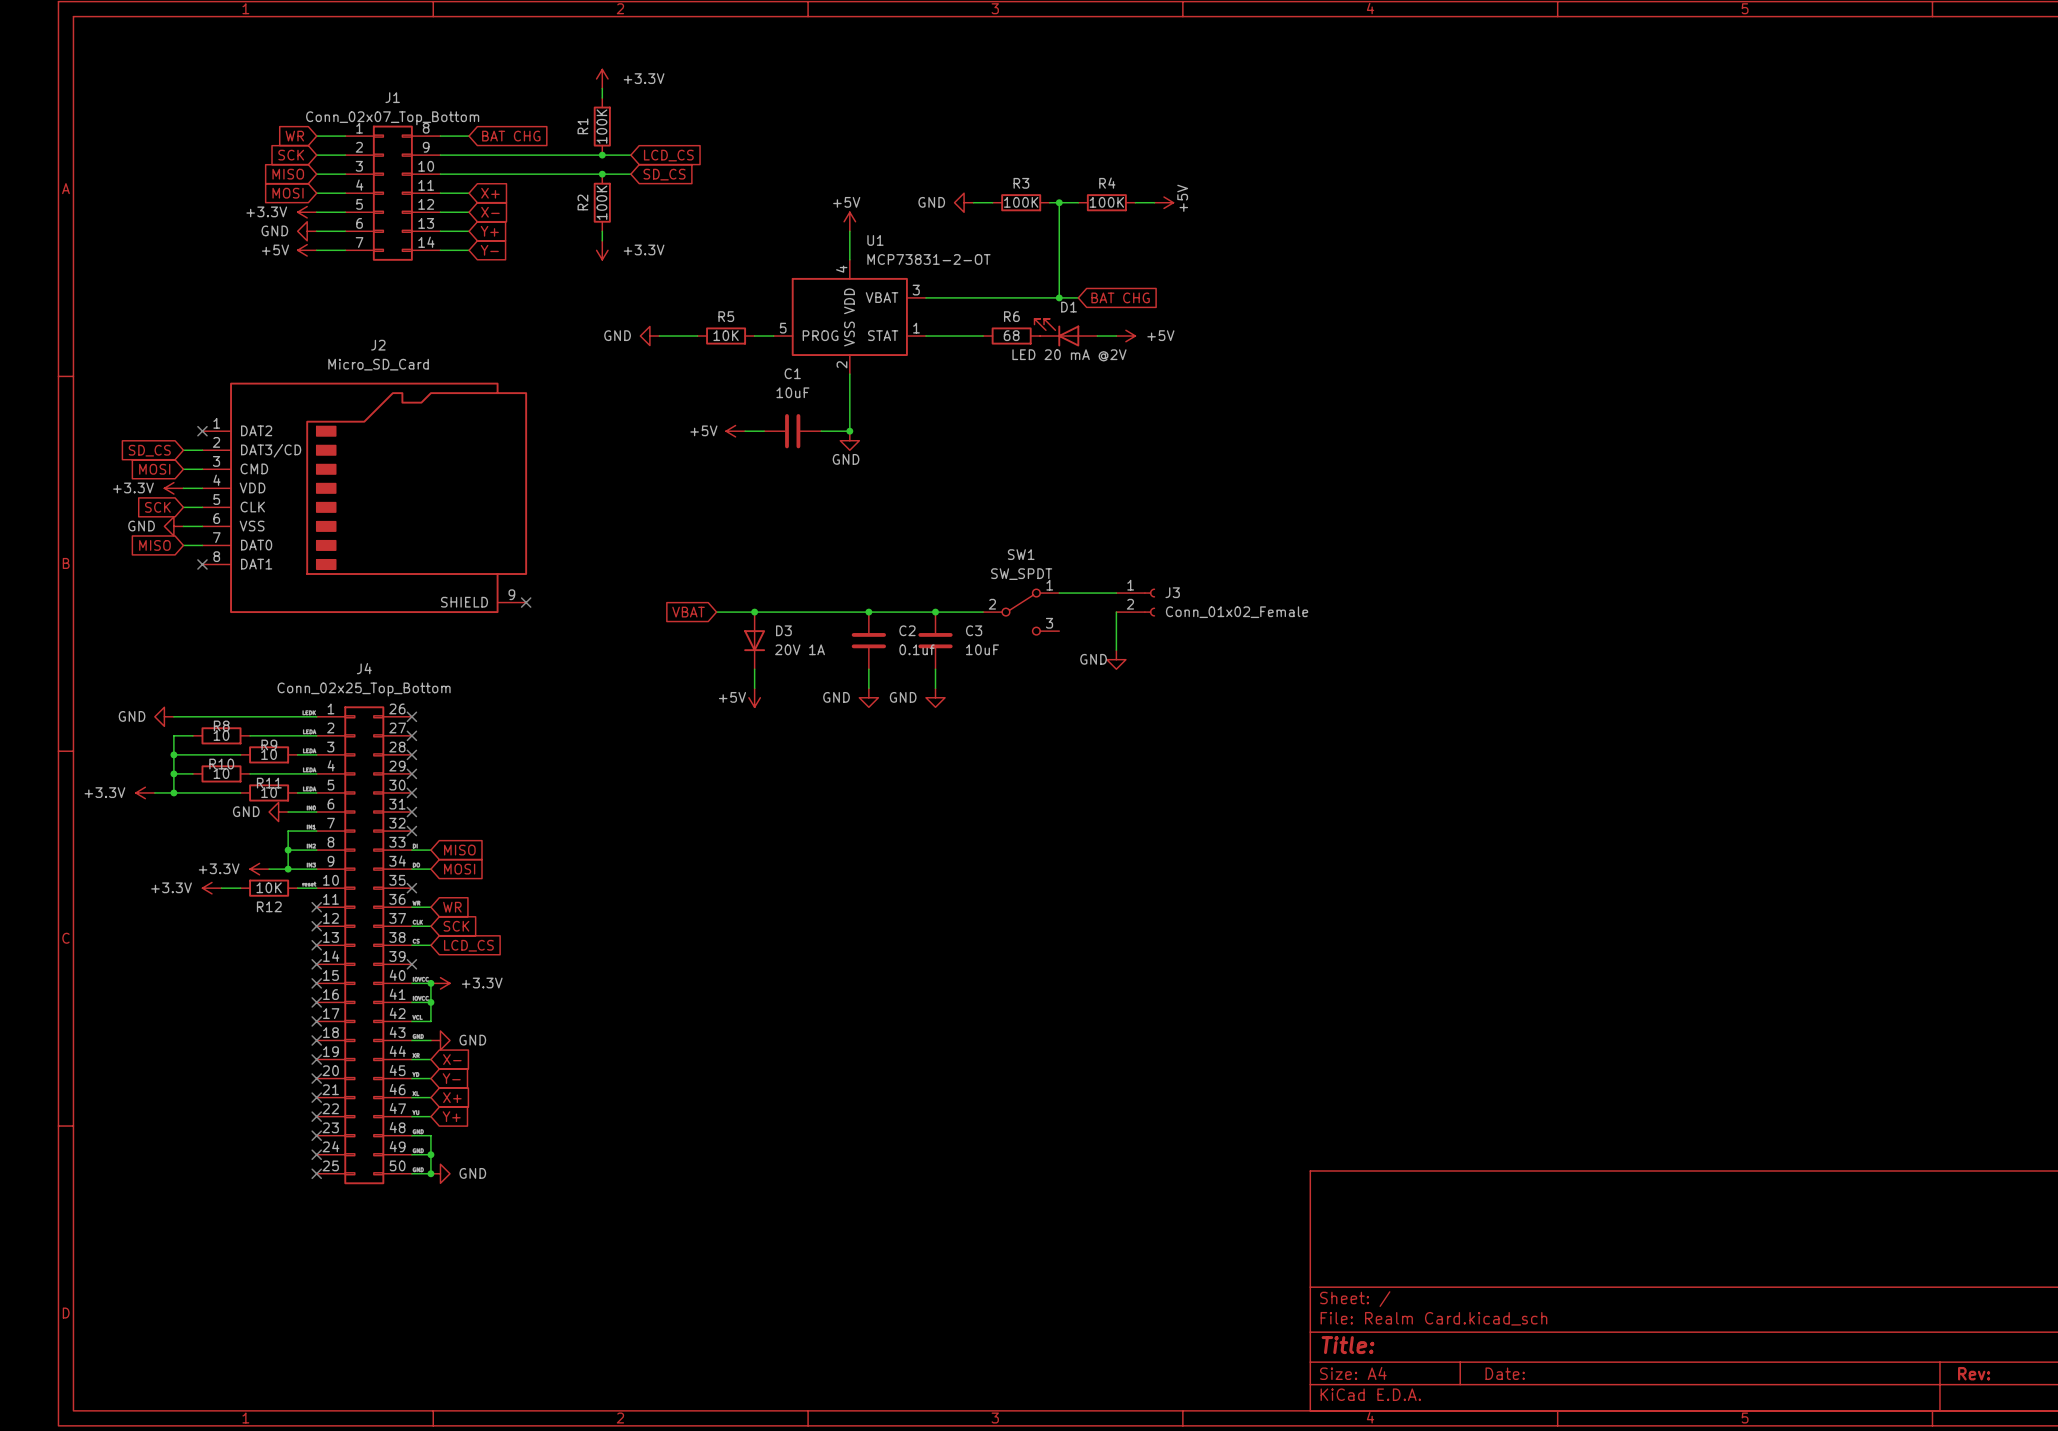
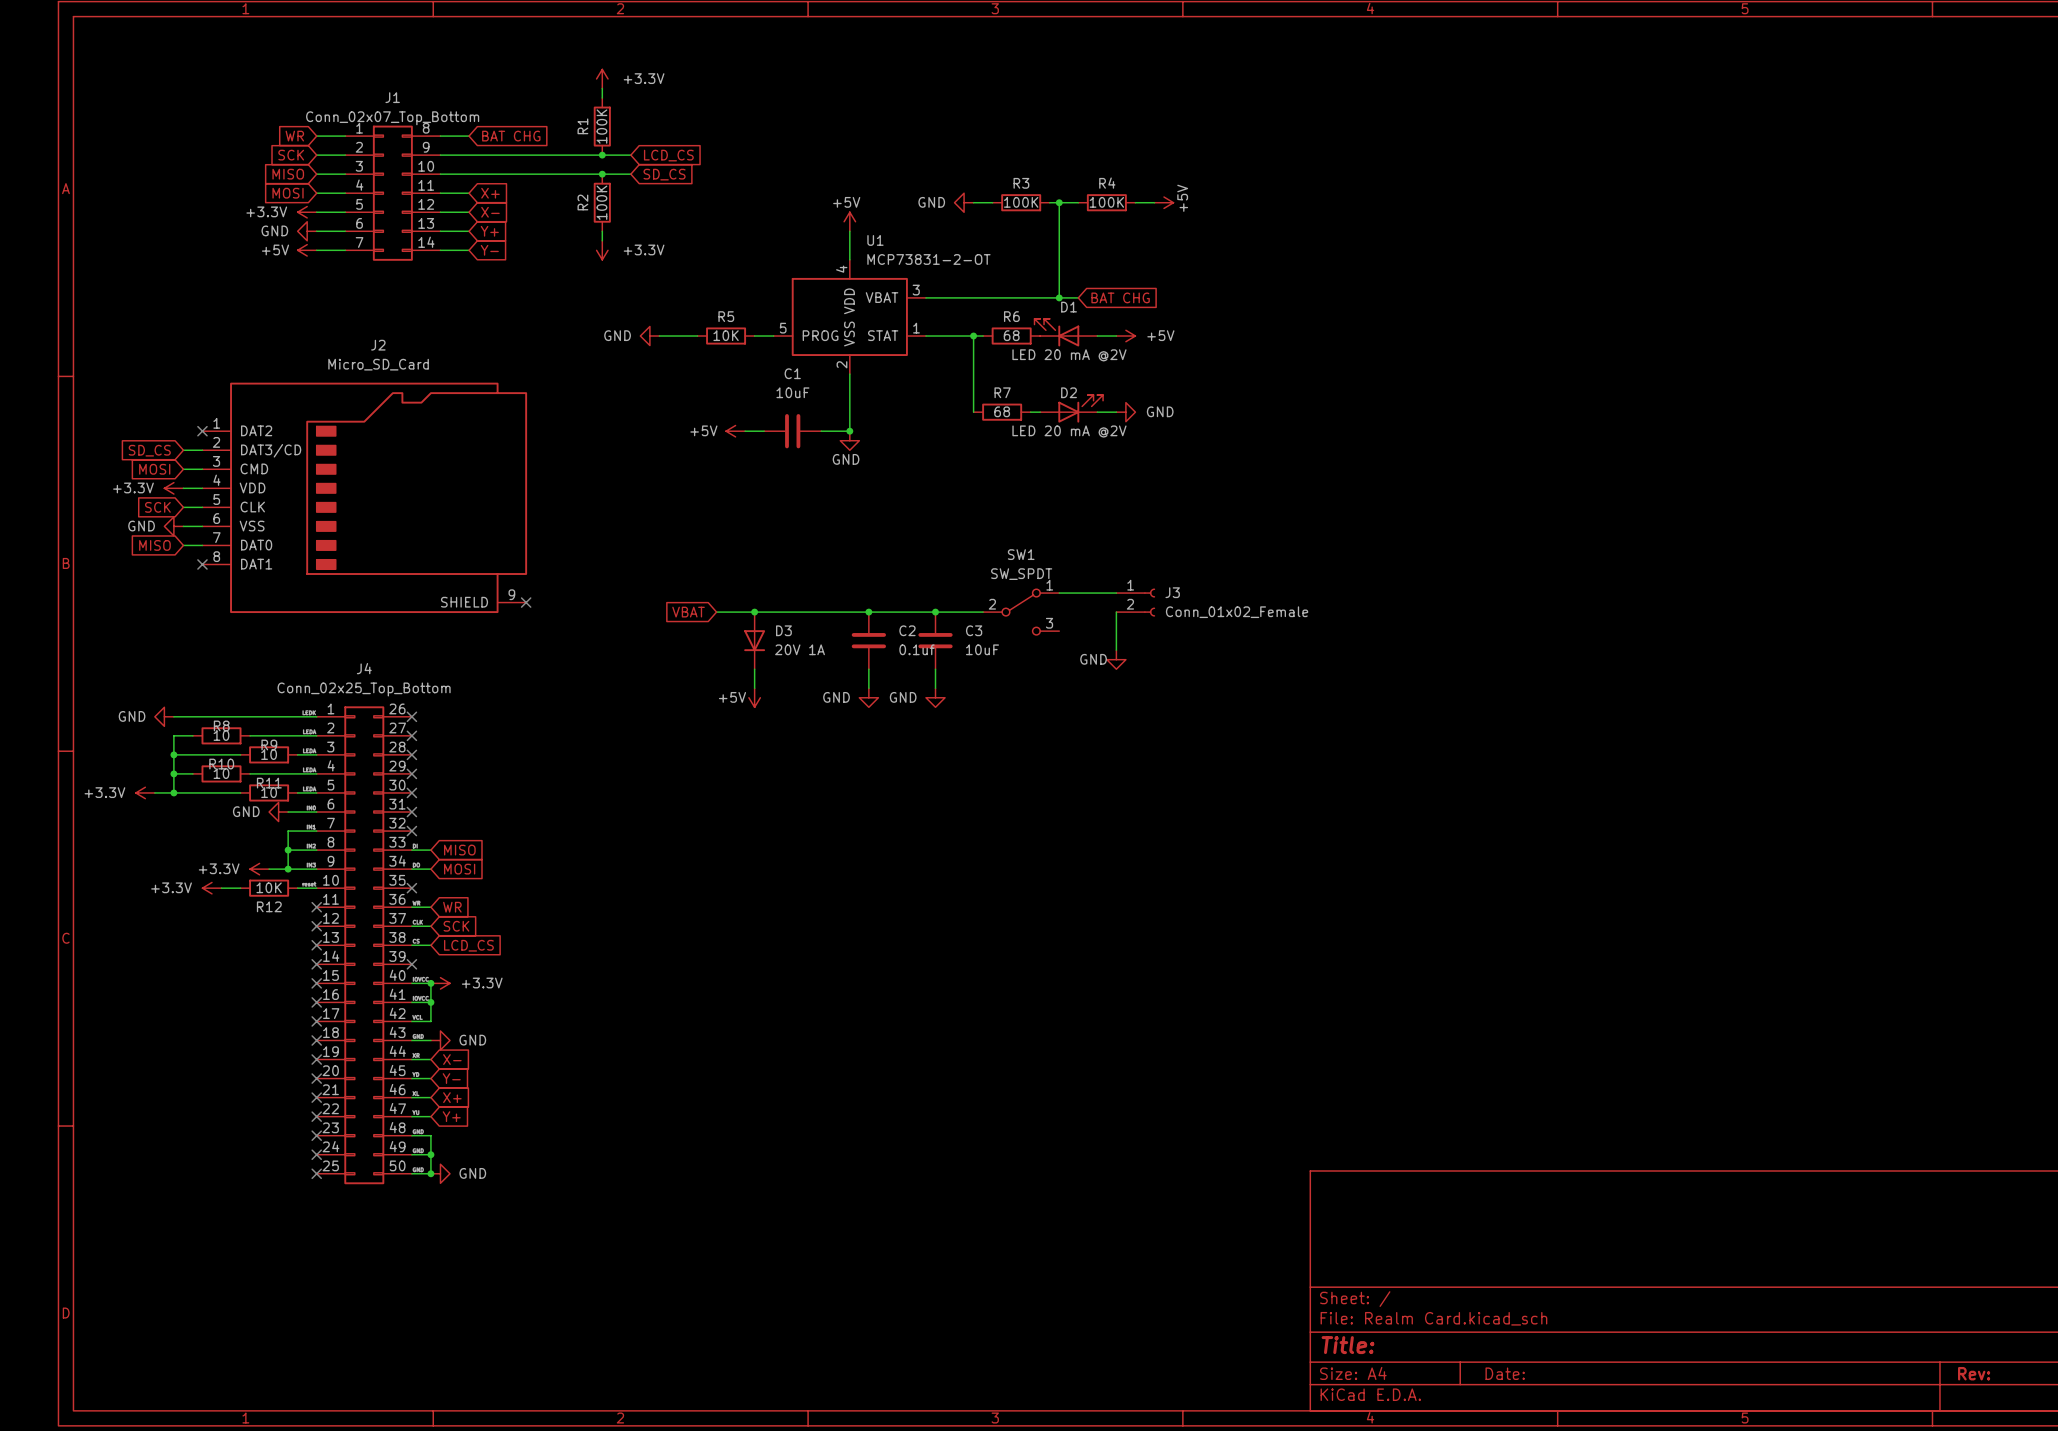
wire: none -> (973, 336) (973, 412)
junction: none -> (973, 336)
D2: none -> LED 20 mA @2V (1071, 408)
R7: none -> 68 (1002, 412)
wire: none -> (1030, 412) (1040, 412)
wire: none -> (1097, 412) (1116, 412)
power symbol: none -> GND (1125, 412)

